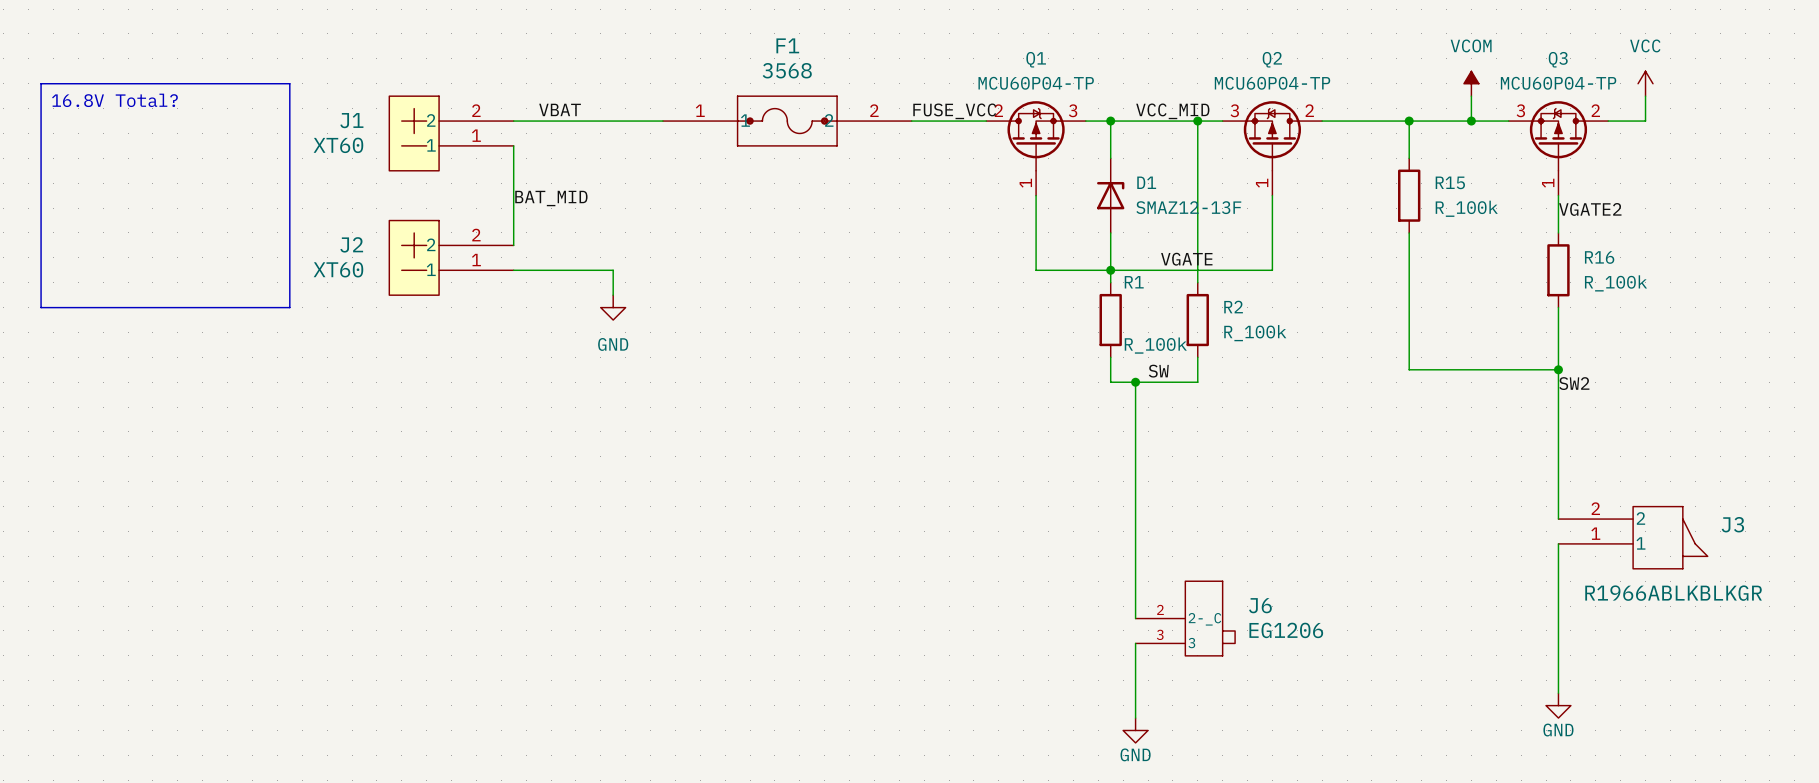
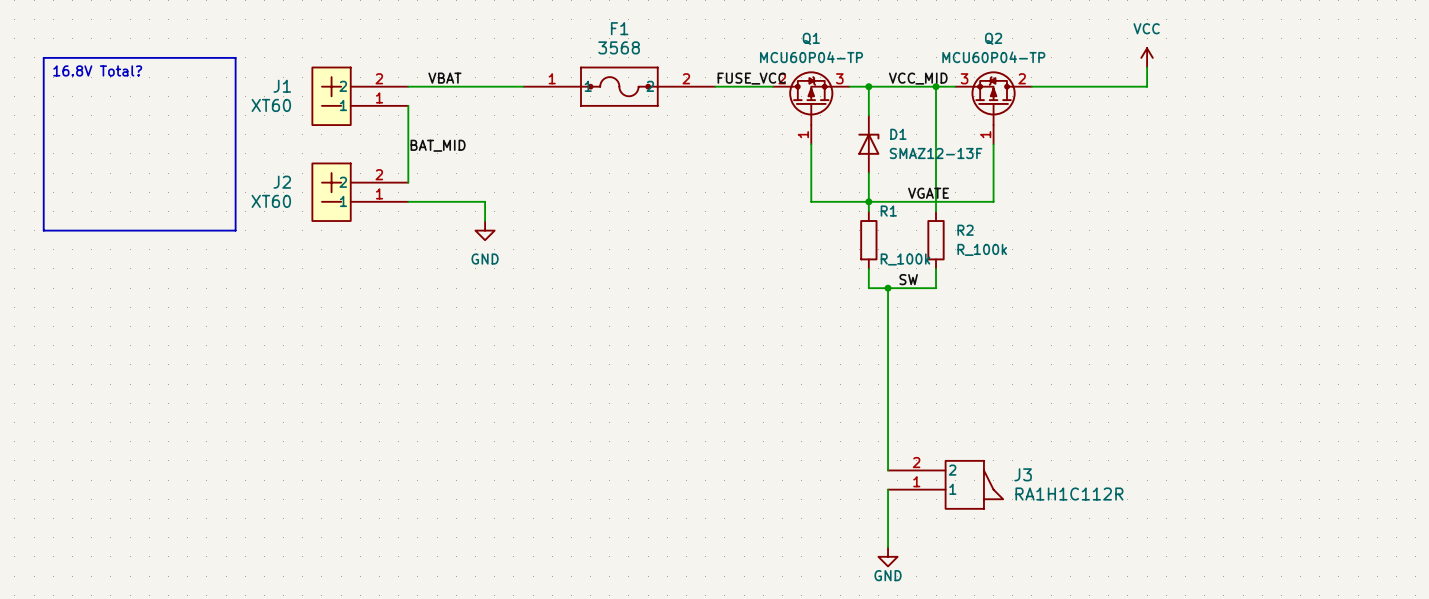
power symbol: VCOM (1471, 83) -> VCC (1147, 57)
power symbol: VCC (1645, 83) -> none
wire: (1645, 96) (1645, 121) (1608, 121) -> none
wire: (1409, 121) (1409, 158) -> none
junction: (1409, 121) -> none
wire: (1471, 121) (1508, 121) -> none
junction: (1471, 121) -> none
Q3: MCU60P04-TP (1558, 148) -> none
R15: R_100k (1409, 195) -> none
wire: (1558, 195) (1558, 232) -> none
label: VGATE2 (1590, 209) -> none
wire: (1409, 232) (1409, 369) (1558, 369) -> none
R16: R_100k (1558, 270) -> none
wire: (1558, 307) (1558, 519) -> none
junction: (1558, 369) -> none
label: SW2 (1574, 383) -> none
J3 position: (1633, 537) -> (945, 484)
wire: (1558, 543) (1558, 693) -> none
J3 value: R1966ABLKBLKGR (1673, 593) -> RA1H1C112R (1069, 494)
J6: EG1206 (1185, 618) -> none
power symbol: GND (1558, 705) -> none

